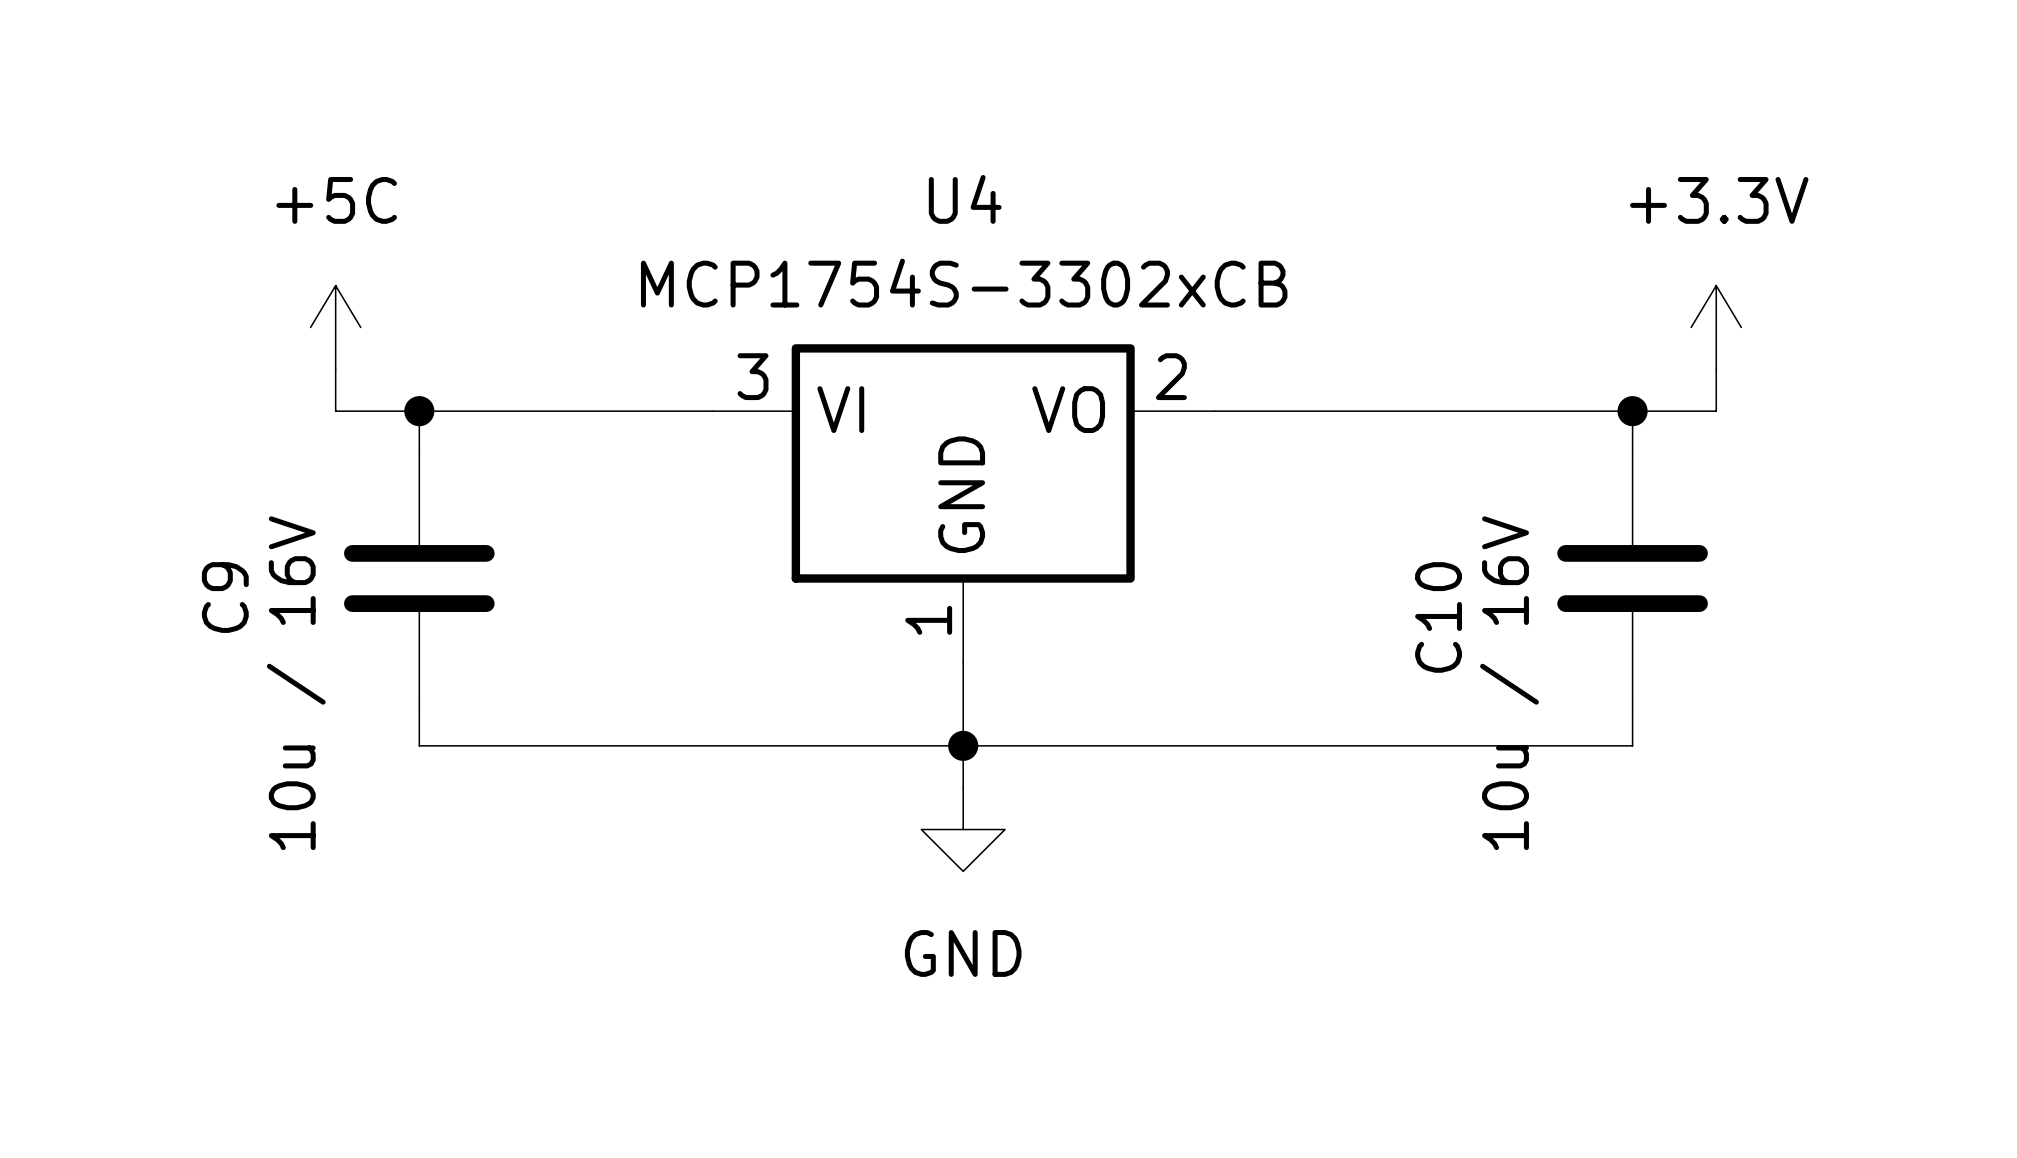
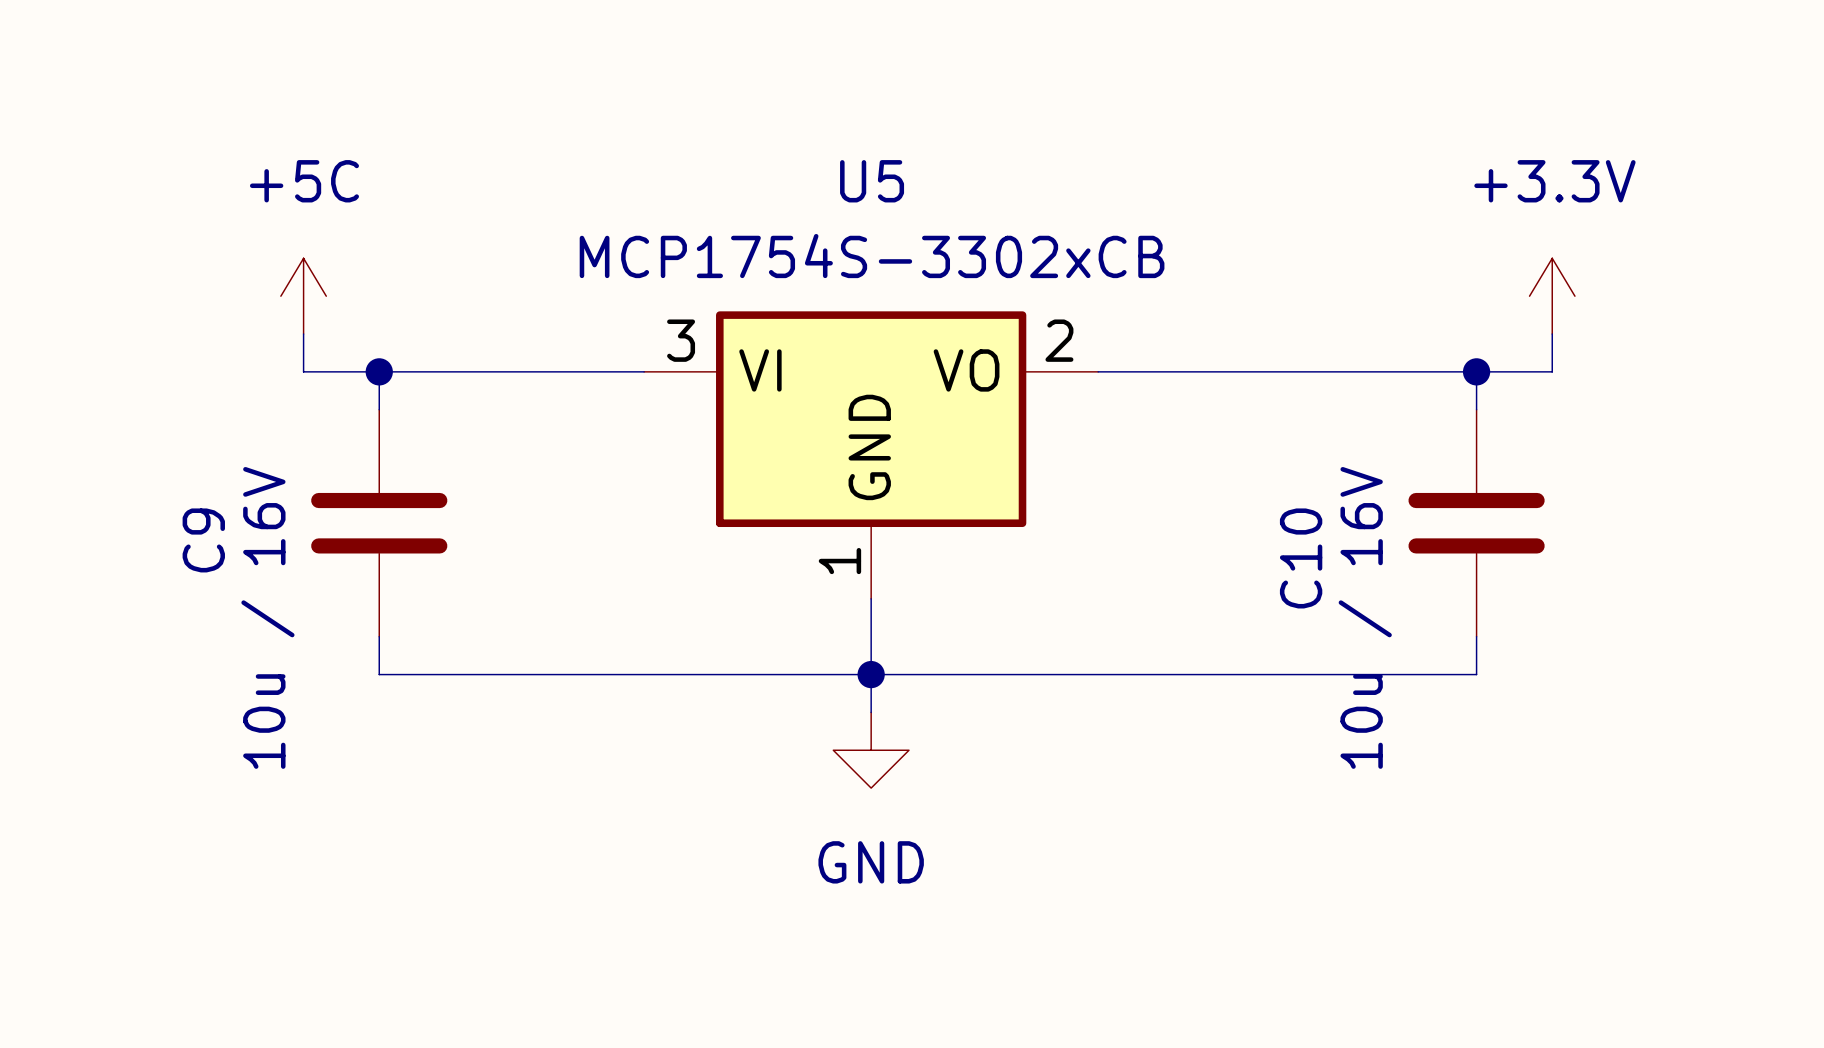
U4 name: U4 (965, 199) -> U5 (872, 181)

